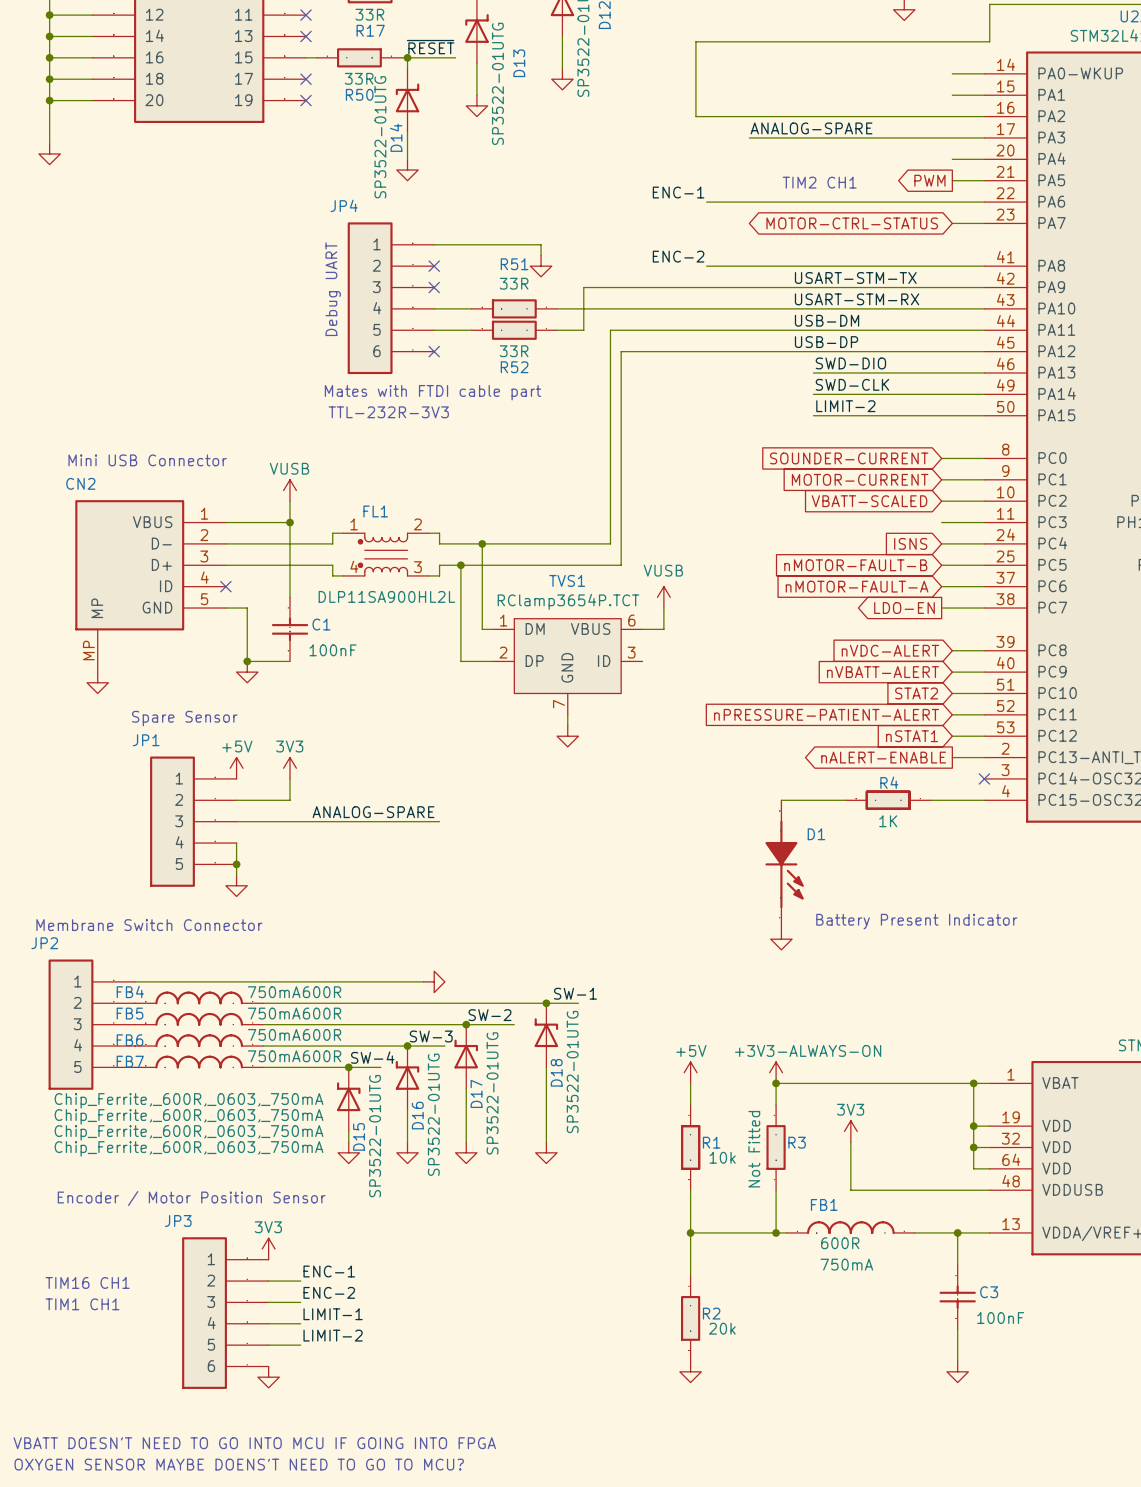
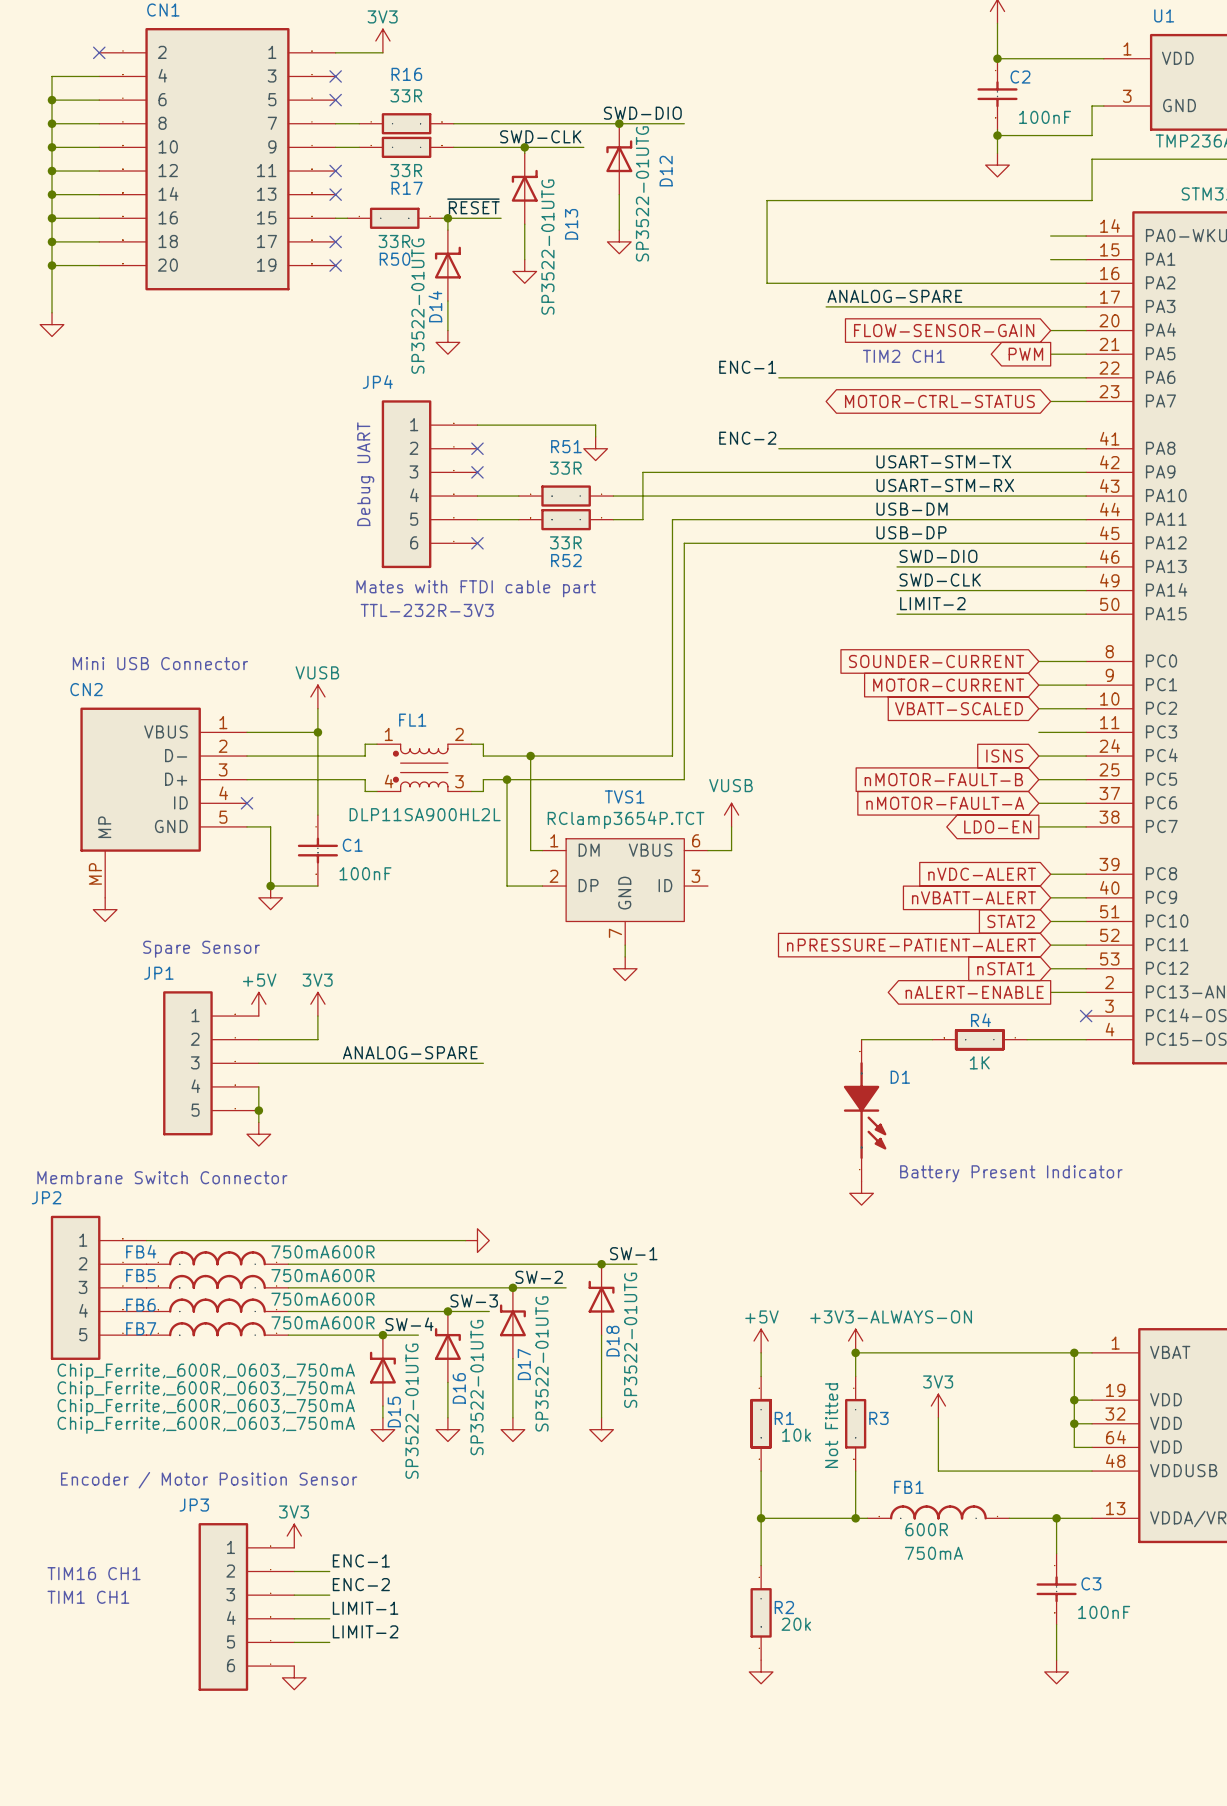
global label: none -> FLOW-SENSOR-GAIN (944, 330)
text: VBATT DOESN'T NEED TO GO INTO MCU IF GOING INTO FPGA (254, 1443) -> none
text: OXYGEN SENSOR MAYBE DOENS'T NEED TO GO TO MCU? (239, 1464) -> none

